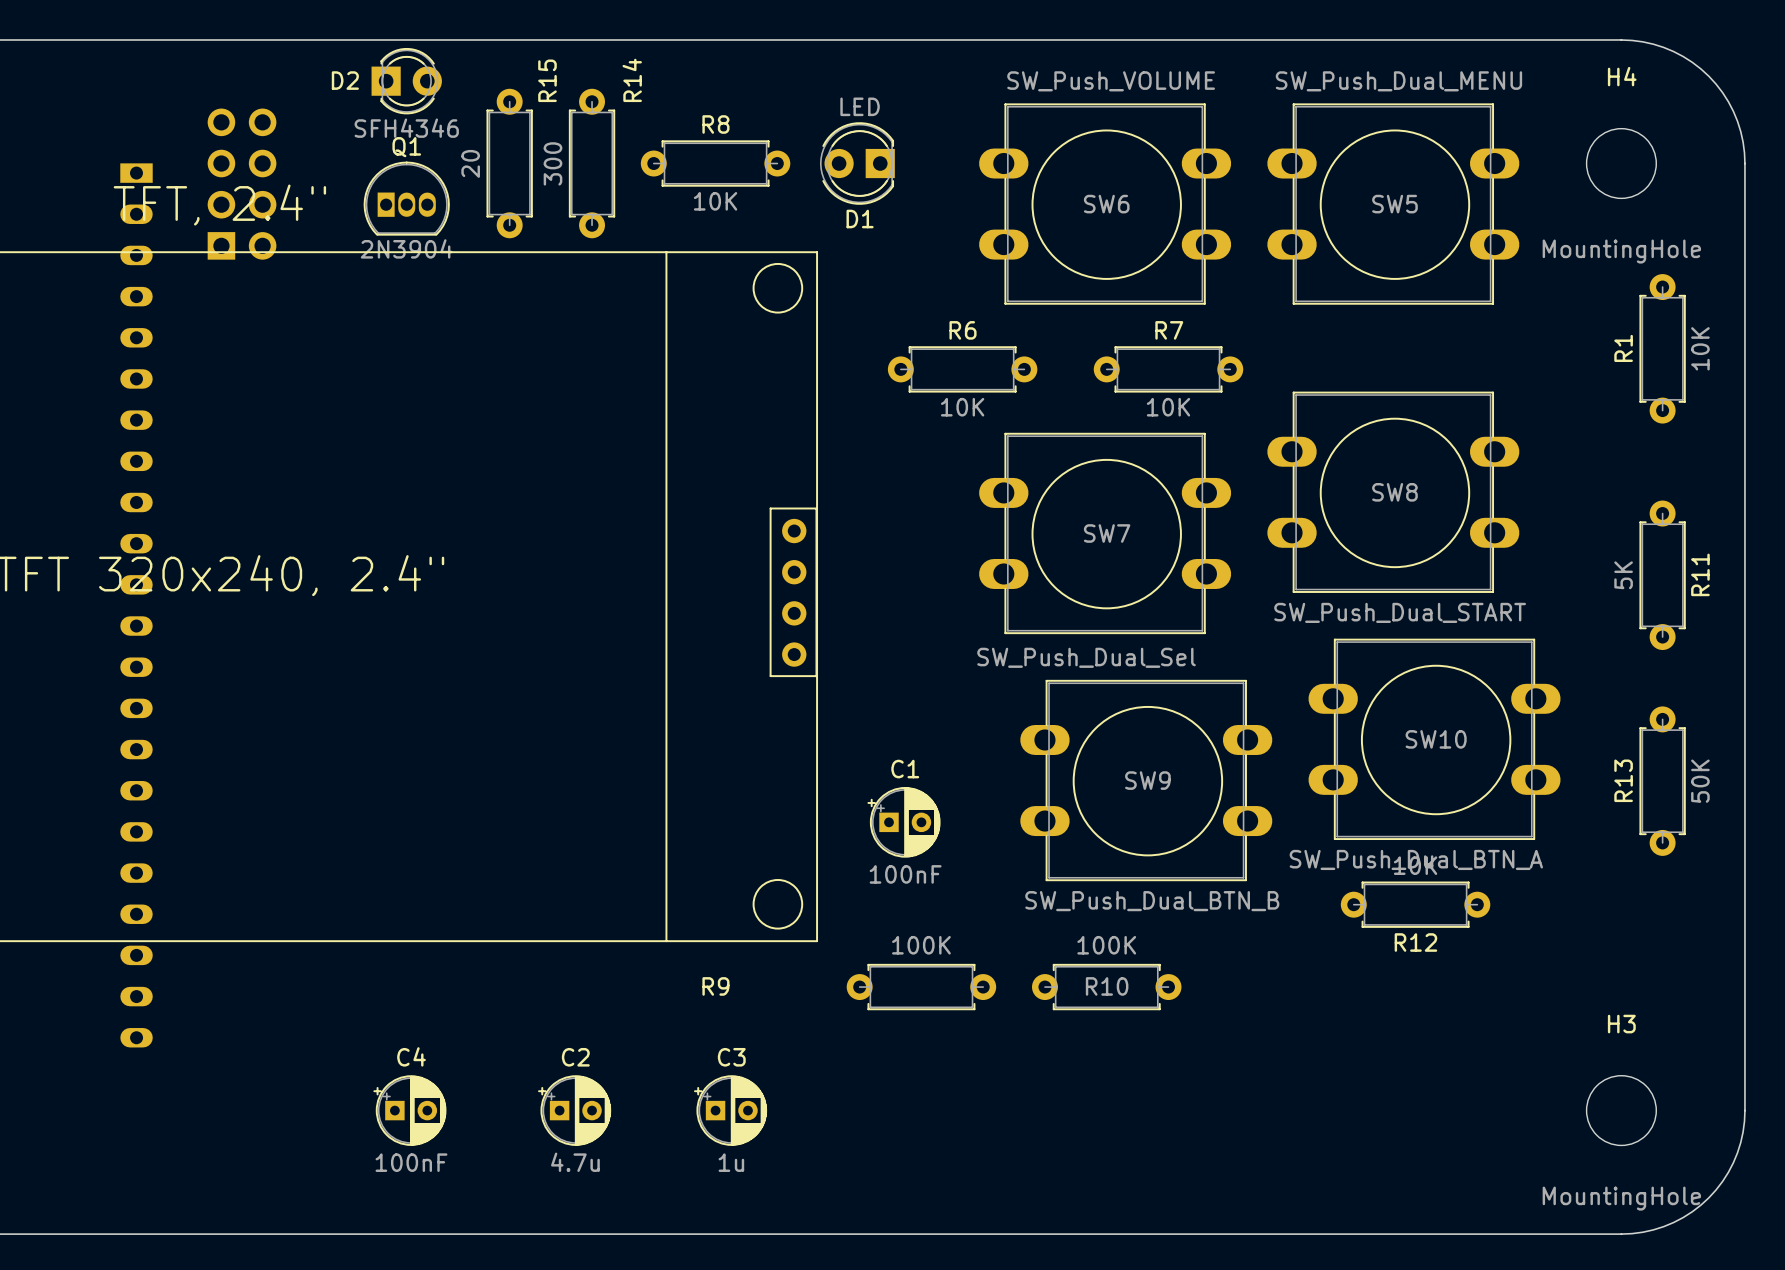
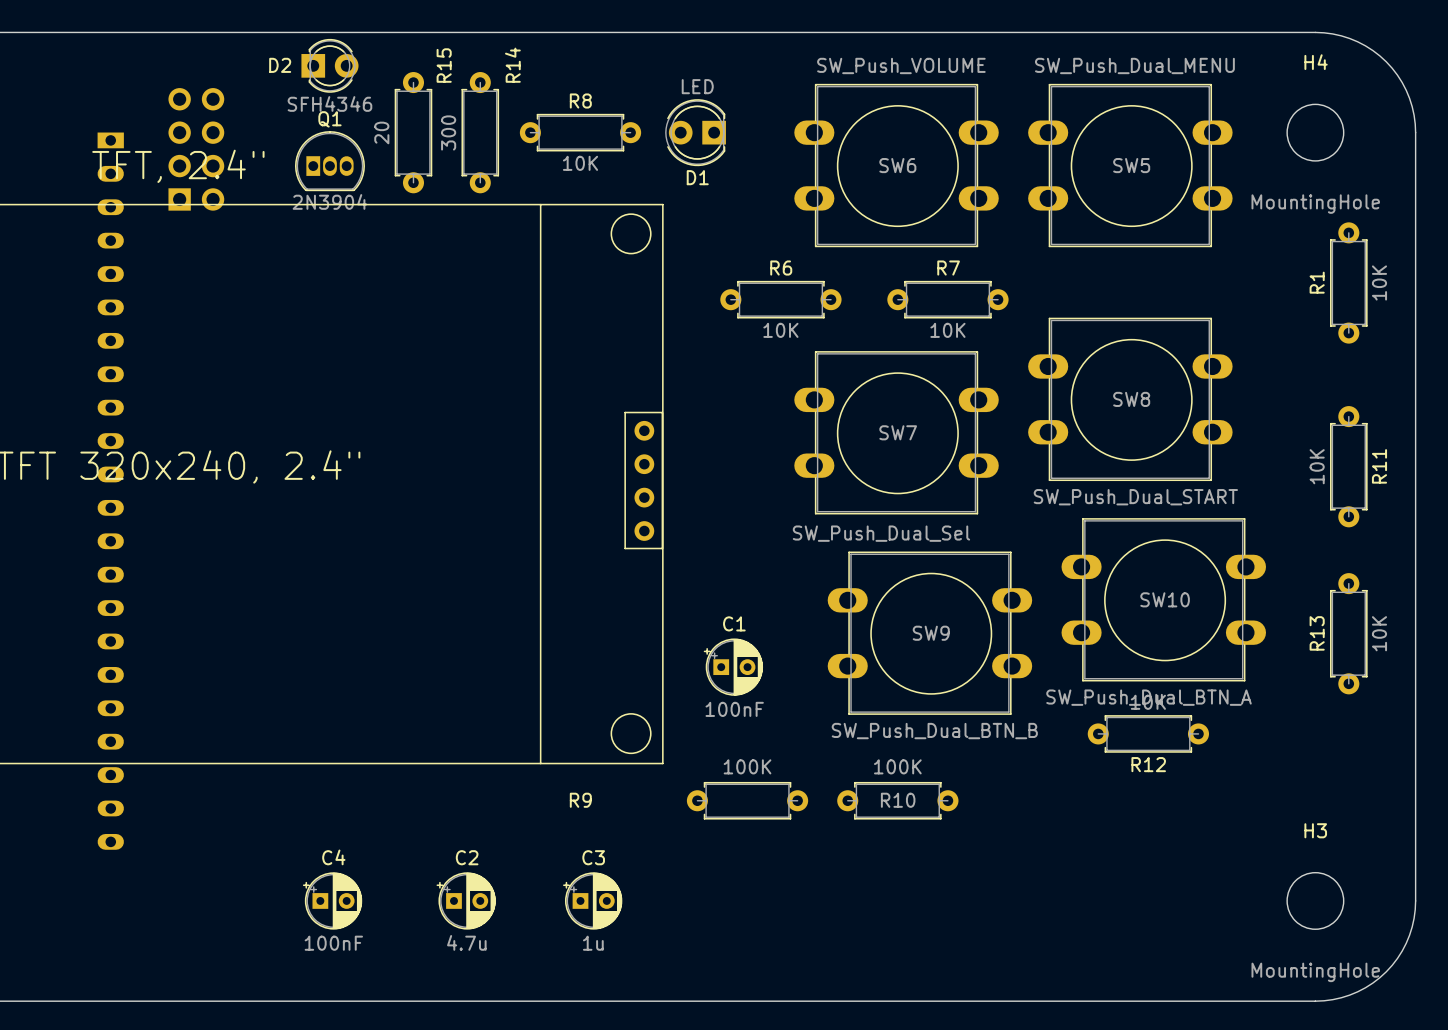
R11 value: 5K (1623, 575) -> 10K (1317, 466)
R13 value: 50K (1700, 781) -> 10K (1379, 633)

